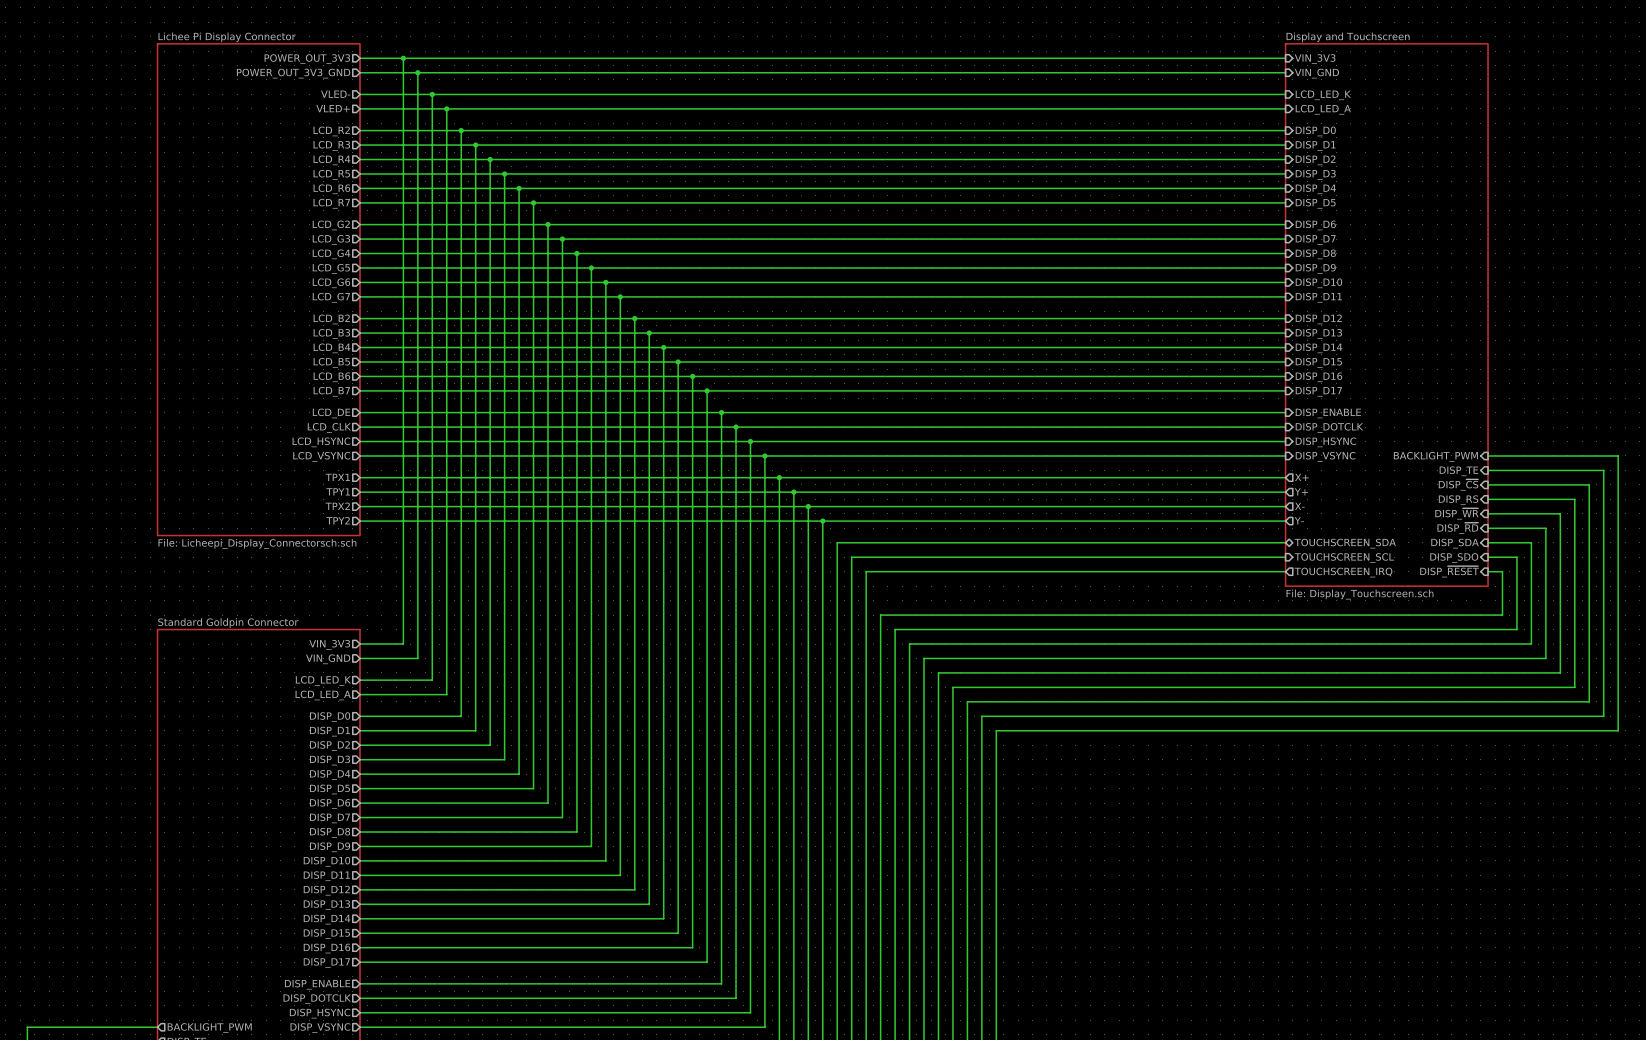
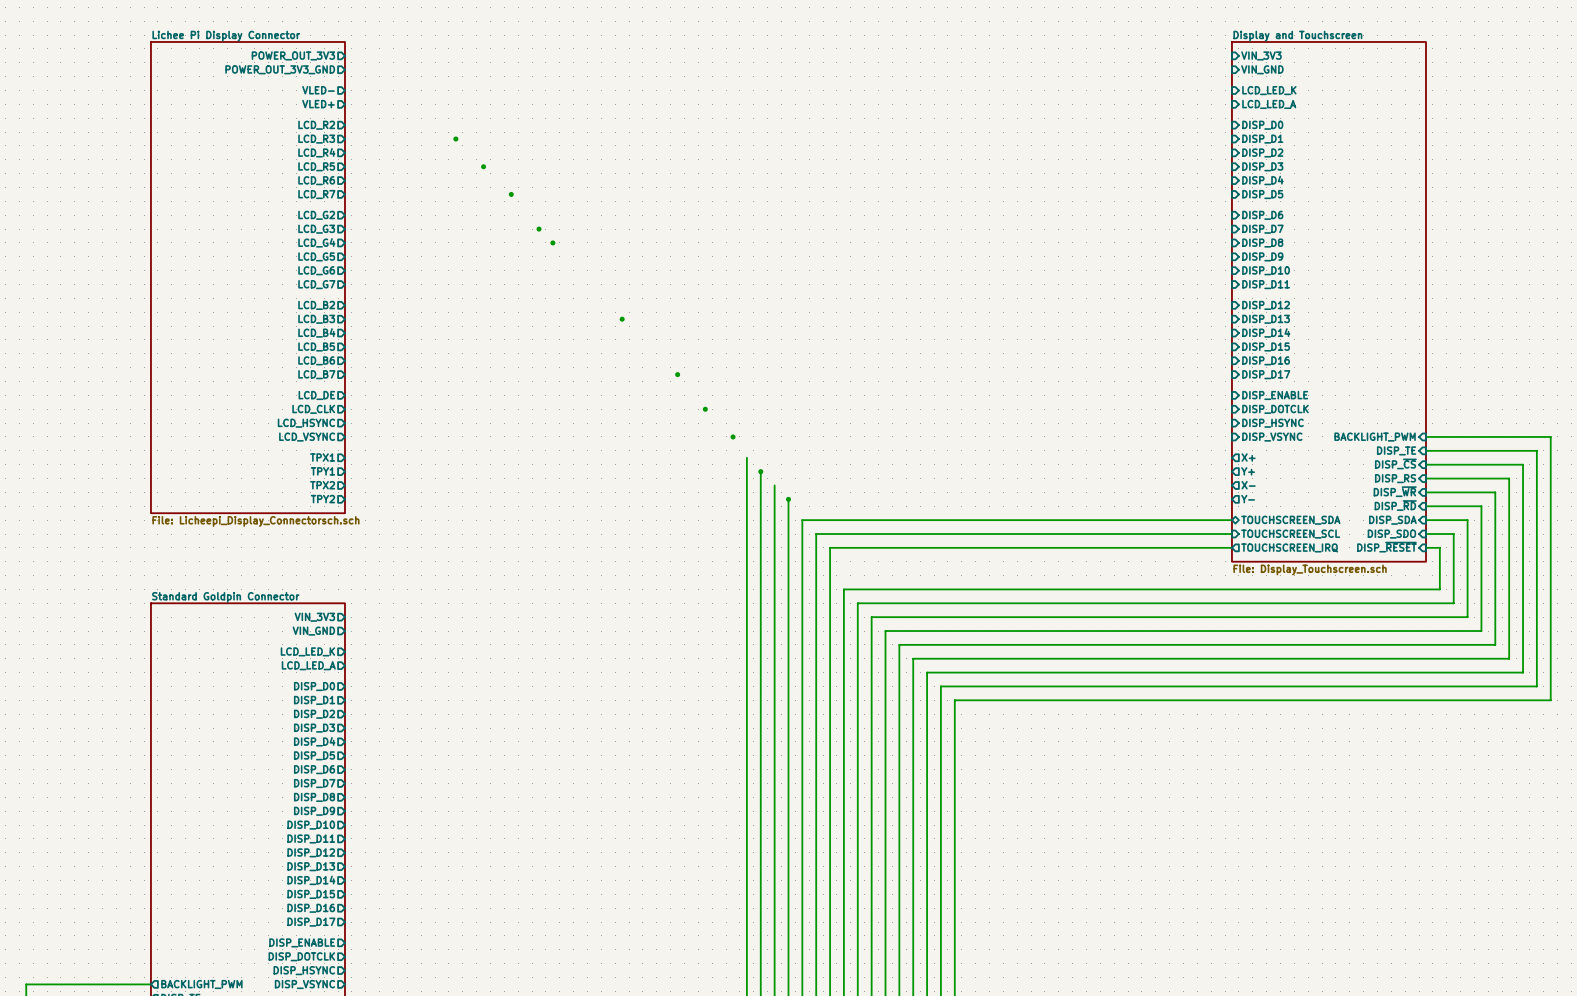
wire: (360, 58) (1285, 58) -> none
wire: (403, 58) (403, 644) (360, 644) -> none
junction: (403, 58) -> none
wire: (360, 72) (1285, 72) -> none
wire: (417, 72) (417, 658) (360, 658) -> none
junction: (417, 72) -> none
wire: (360, 94) (1285, 94) -> none
wire: (432, 94) (432, 680) (360, 680) -> none
junction: (432, 94) -> none
wire: (360, 108) (1285, 108) -> none
wire: (446, 108) (446, 694) (360, 694) -> none
junction: (446, 108) -> none
wire: (360, 130) (1285, 130) -> none
wire: (461, 130) (461, 716) (360, 716) -> none
junction: (461, 130) -> none
wire: (360, 145) (1285, 145) -> none
wire: (475, 145) (475, 730) (360, 730) -> none
wire: (360, 159) (1285, 159) -> none
wire: (490, 159) (490, 745) (360, 745) -> none
junction: (490, 159) -> none
wire: (360, 173) (1285, 173) -> none
wire: (504, 173) (504, 759) (360, 759) -> none
wire: (360, 188) (1285, 188) -> none
wire: (519, 188) (519, 774) (360, 774) -> none
junction: (519, 188) -> none
wire: (360, 202) (1285, 202) -> none
wire: (533, 202) (533, 788) (360, 788) -> none
wire: (360, 224) (1285, 224) -> none
wire: (548, 224) (548, 803) (360, 803) -> none
junction: (548, 224) -> none
wire: (360, 239) (1285, 239) -> none
wire: (562, 239) (562, 817) (360, 817) -> none
wire: (360, 253) (1285, 253) -> none
wire: (576, 253) (576, 832) (360, 832) -> none
wire: (360, 267) (1285, 267) -> none
wire: (591, 267) (591, 846) (360, 846) -> none
junction: (591, 267) -> none
wire: (360, 282) (1285, 282) -> none
wire: (605, 282) (605, 860) (360, 860) -> none
junction: (605, 282) -> none
wire: (360, 296) (1285, 296) -> none
wire: (620, 296) (620, 875) (360, 875) -> none
junction: (620, 296) -> none
wire: (360, 318) (1285, 318) -> none
wire: (634, 318) (634, 889) (360, 889) -> none
junction: (634, 318) -> none
wire: (360, 333) (1285, 333) -> none
wire: (649, 333) (649, 904) (360, 904) -> none
wire: (360, 347) (1285, 347) -> none
wire: (663, 347) (663, 918) (360, 918) -> none
junction: (663, 347) -> none
wire: (360, 361) (1285, 361) -> none
wire: (678, 361) (678, 933) (360, 933) -> none
junction: (678, 361) -> none
wire: (360, 376) (1285, 376) -> none
wire: (692, 376) (692, 947) (360, 947) -> none
junction: (692, 376) -> none
wire: (360, 390) (1285, 390) -> none
wire: (707, 390) (707, 962) (360, 962) -> none
wire: (360, 412) (1285, 412) -> none
wire: (721, 412) (721, 983) (360, 983) -> none
junction: (721, 412) -> none
wire: (360, 427) (1285, 427) -> none
wire: (736, 427) (736, 998) (360, 998) -> none
wire: (360, 441) (1285, 441) -> none
wire: (750, 441) (750, 1012) (360, 1012) -> none
junction: (750, 441) -> none
wire: (360, 455) (1285, 455) -> none
wire: (764, 455) (764, 1027) (360, 1027) -> none
wire: (360, 477) (1285, 477) -> none
junction: (779, 477) -> none
wire: (360, 492) (1285, 492) -> none
wire: (360, 506) (1285, 506) -> none
junction: (808, 506) -> none
wire: (360, 521) (1285, 521) -> none

